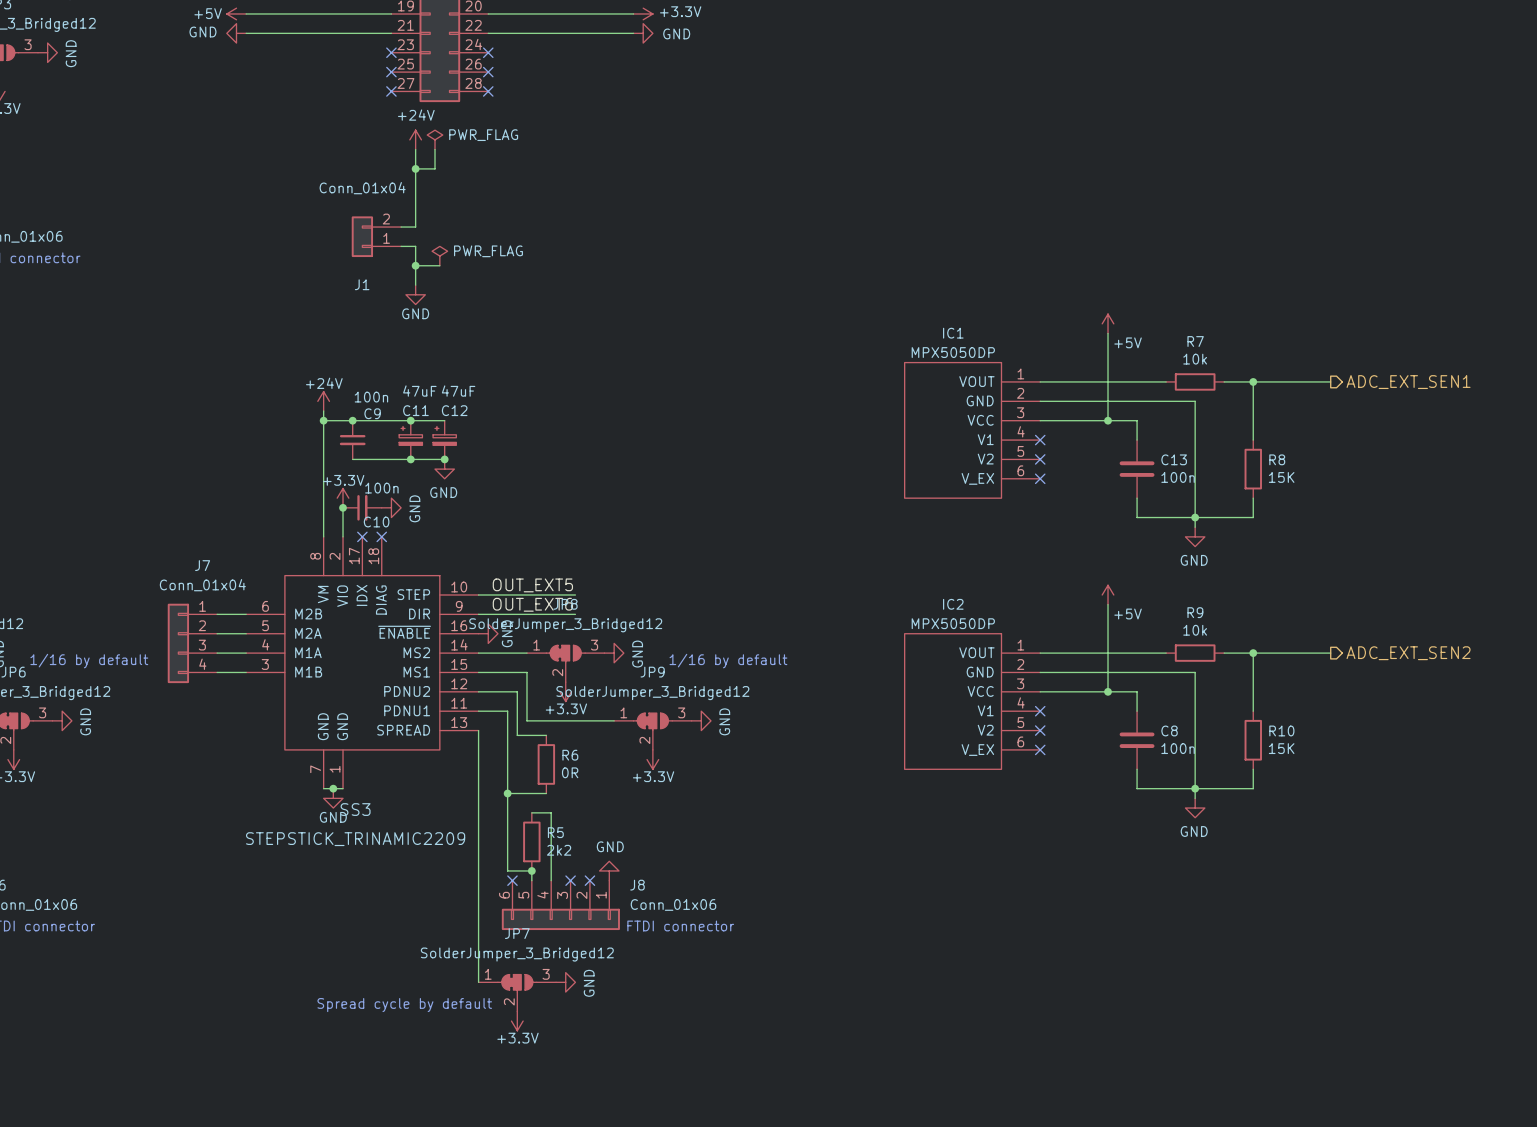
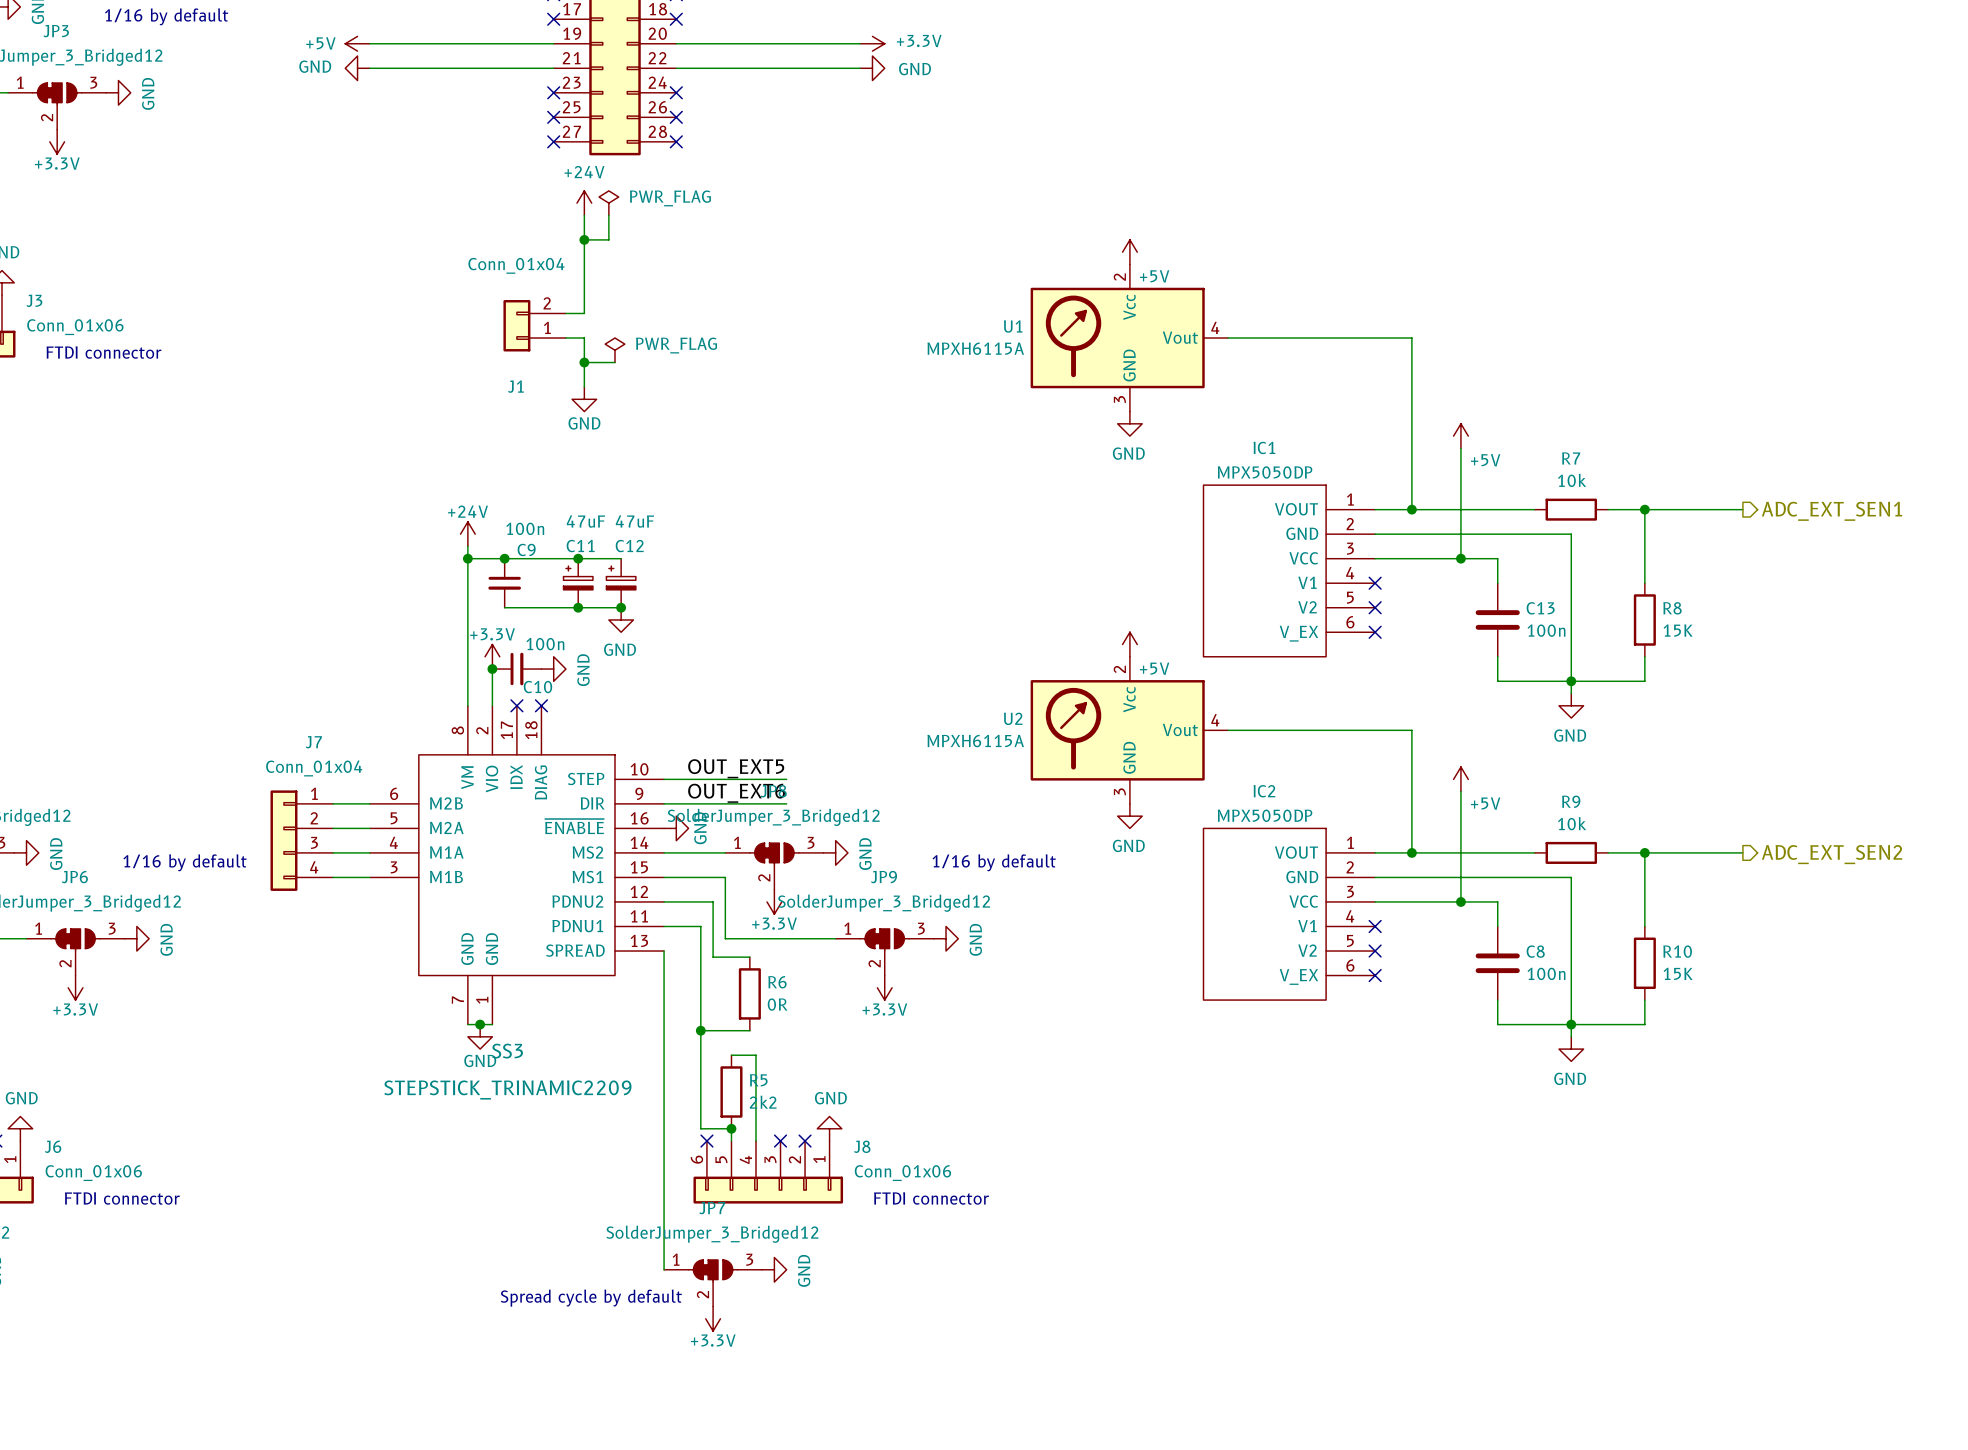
power symbol: none -> +5V (1129, 252)
U1: none -> MPXH6115A (1129, 338)
wire: none -> (1228, 338) (1411, 338) (1411, 509)
power symbol: none -> GND (1129, 423)
junction: none -> (1411, 509)
power symbol: none -> +5V (1129, 644)
U2: none -> MPXH6115A (1129, 730)
wire: none -> (1228, 730) (1411, 730) (1411, 852)
power symbol: none -> GND (1129, 816)
junction: none -> (1411, 852)

